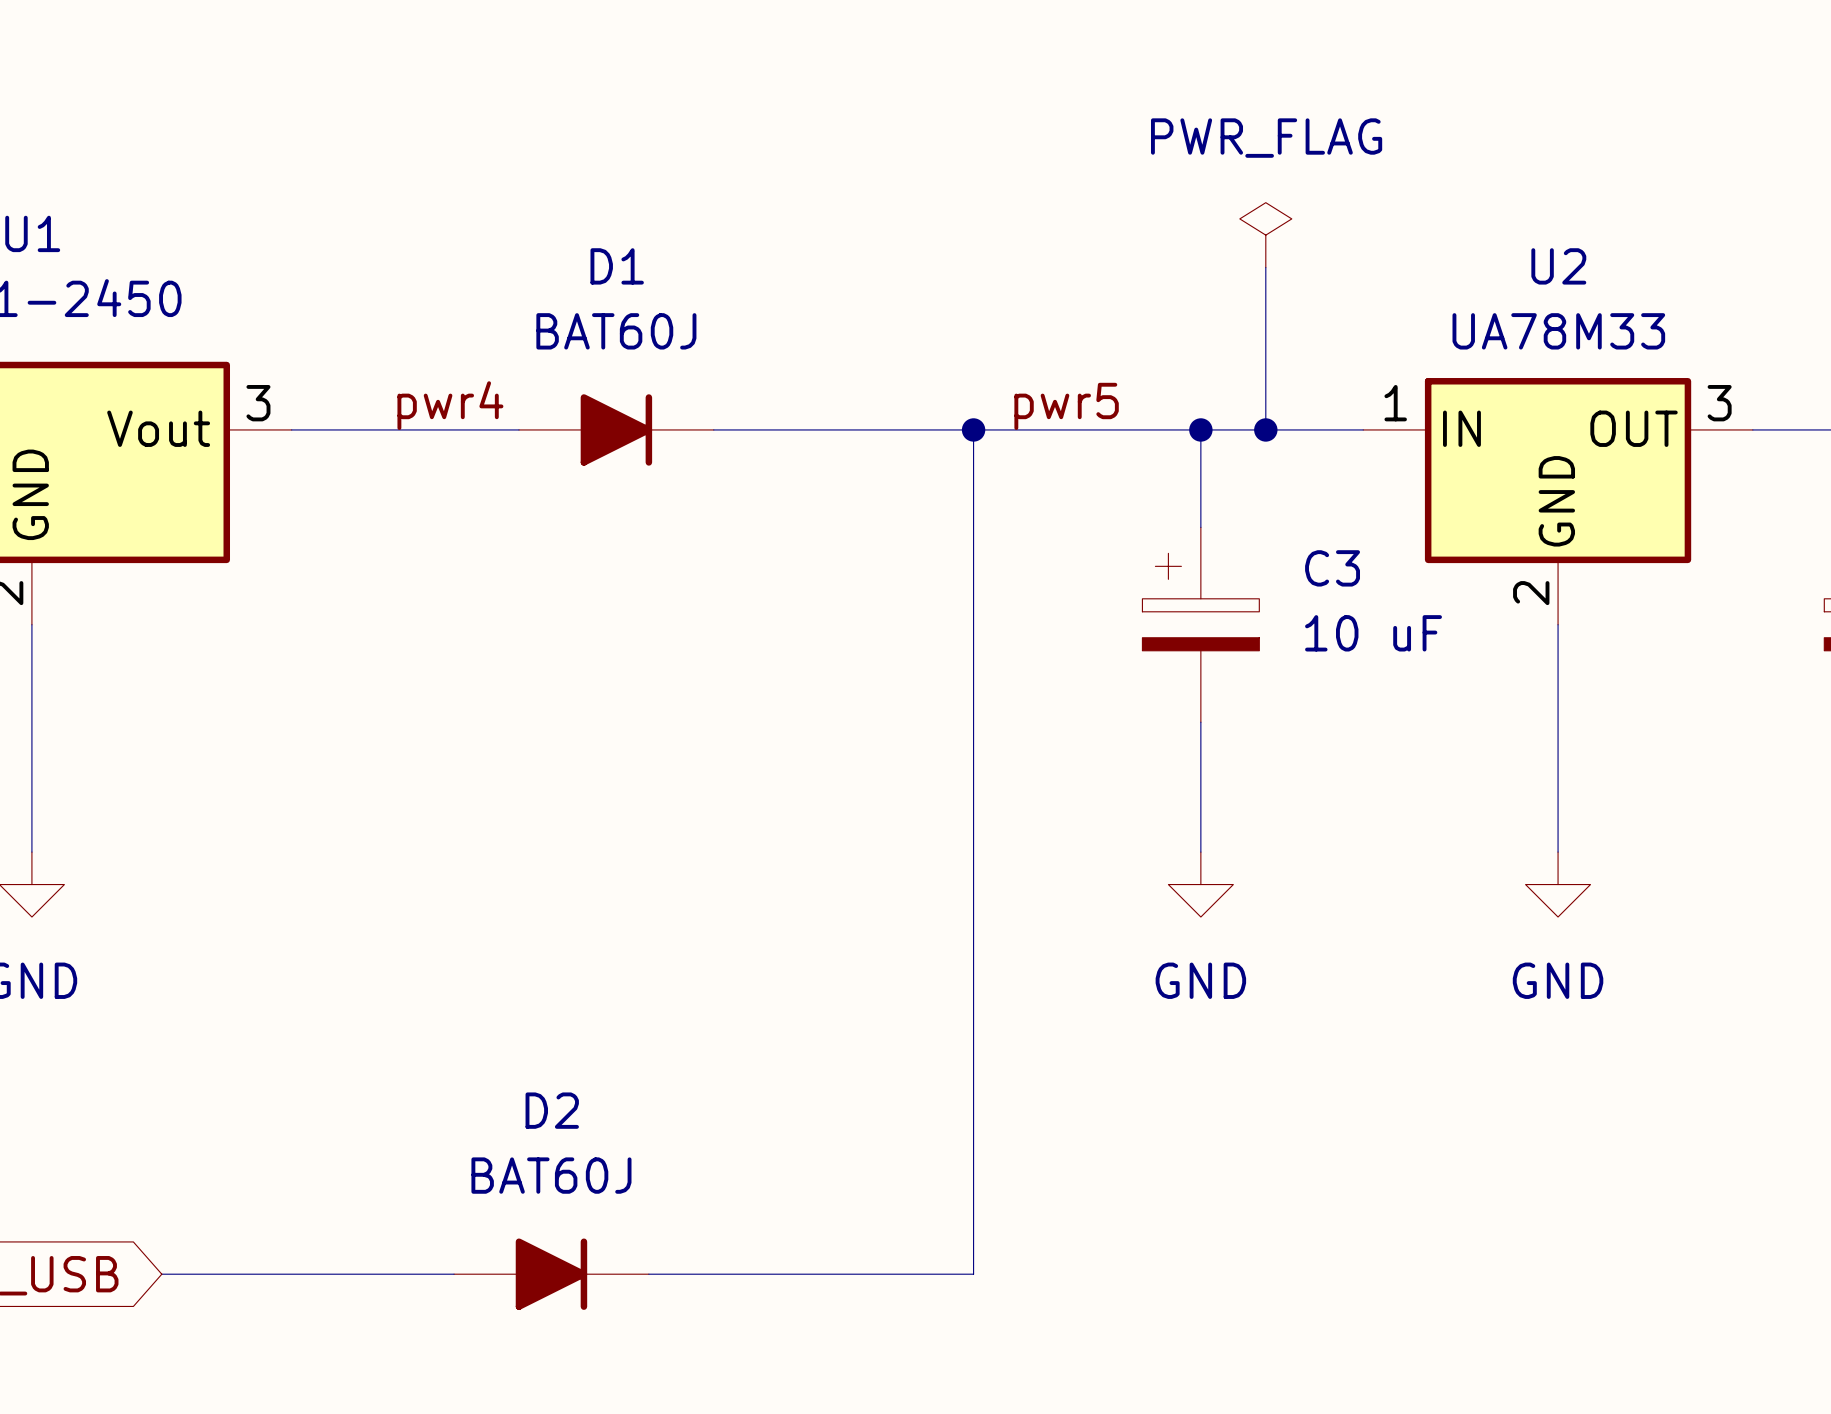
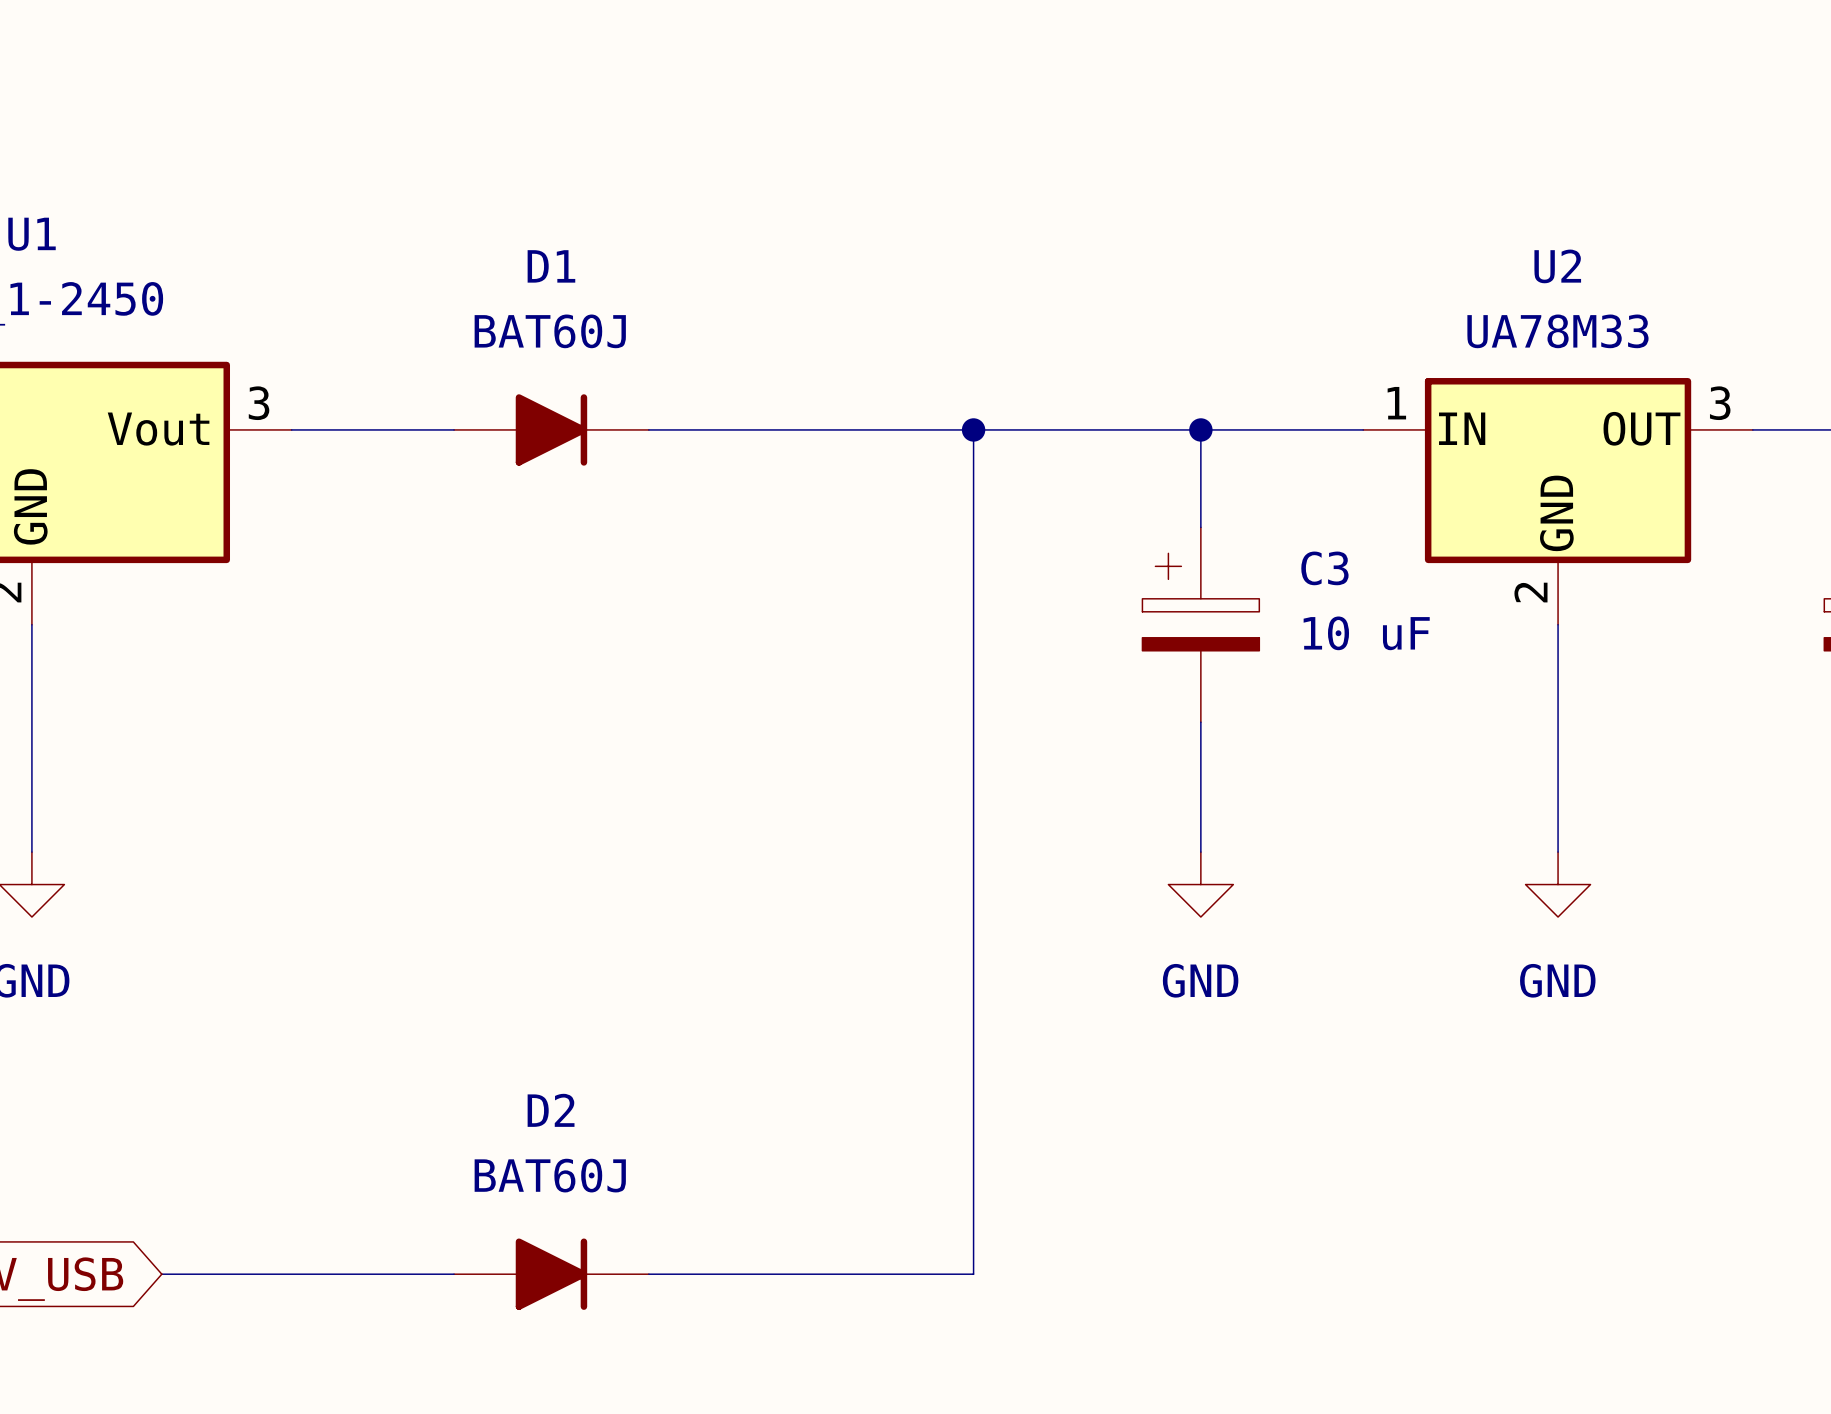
power symbol: PWR_FLAG (1265, 235) -> none
wire: (1265, 267) (1265, 429) -> none
label: pwr4 (450, 405) -> none
label: pwr5 (1066, 406) -> none
D1 position: (616, 429) -> (551, 429)
junction: (1265, 429) -> none

